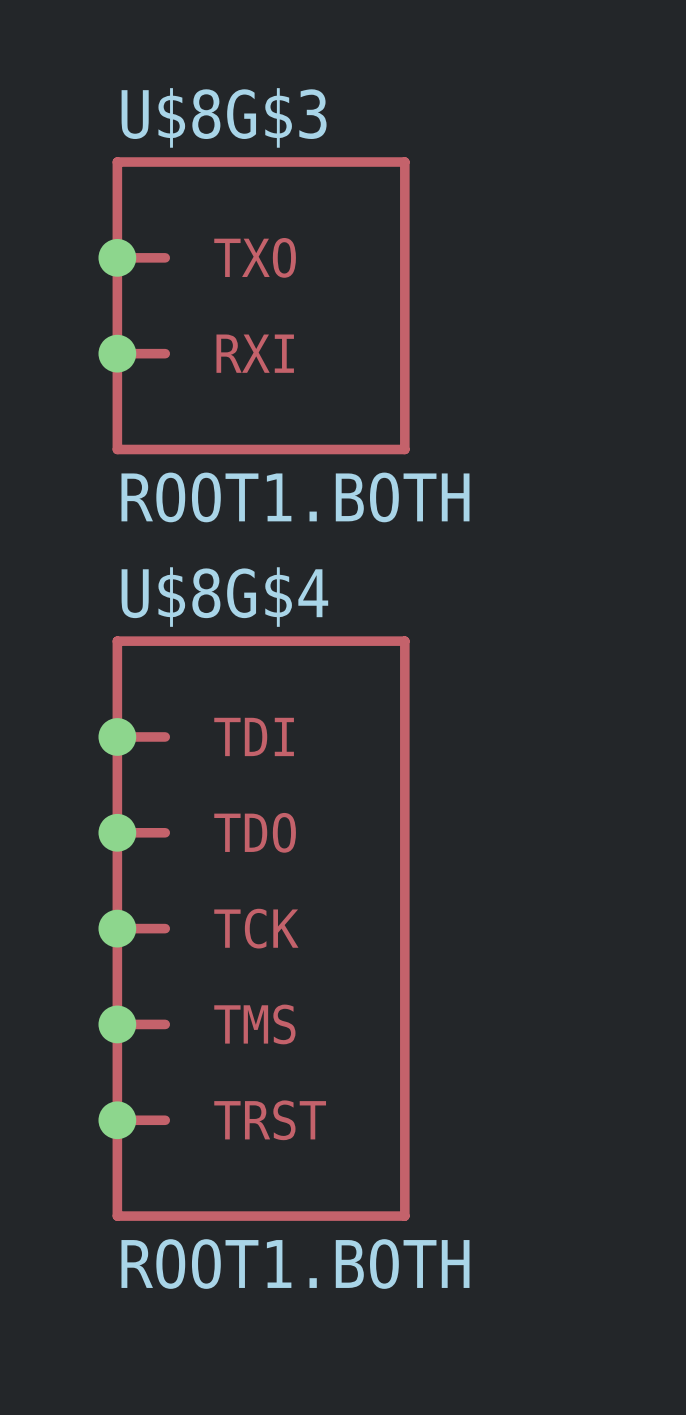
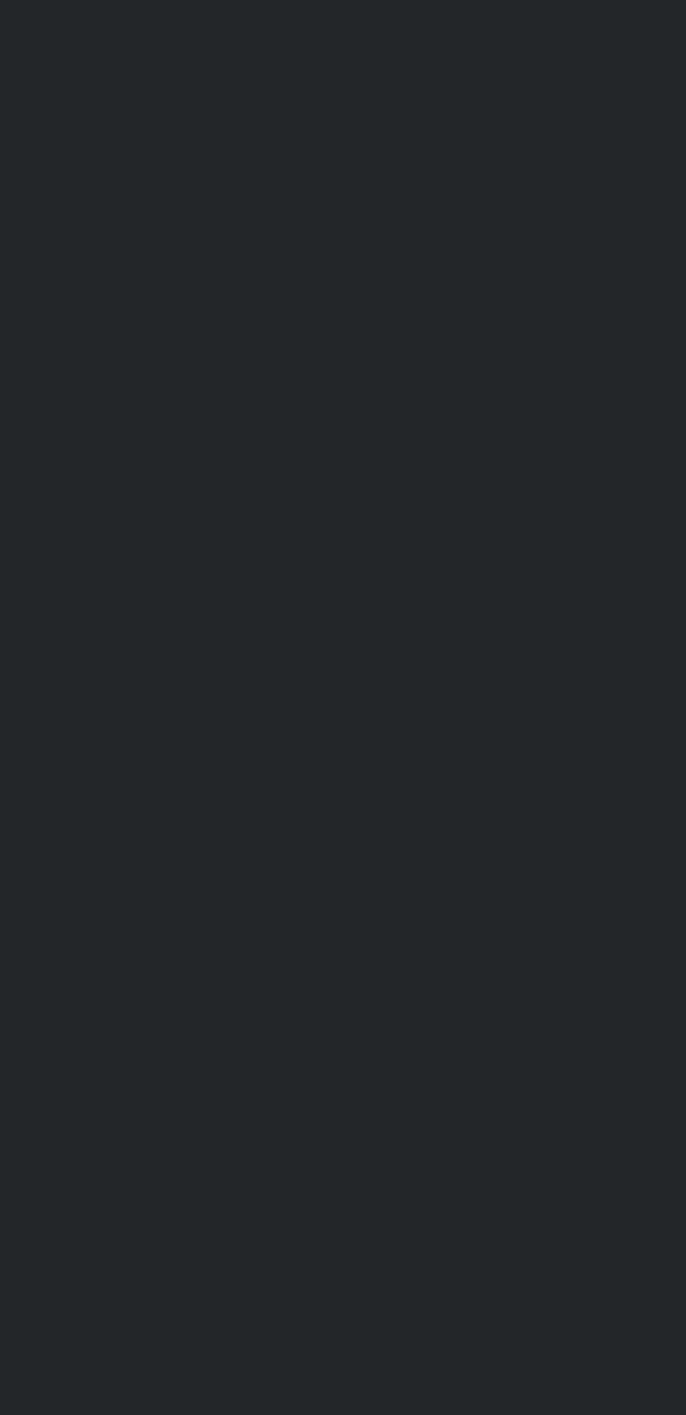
junction: (117, 257) -> none
U$8G$3: ROOT1.BOTH (261, 305) -> none
junction: (117, 353) -> none
junction: (117, 736) -> none
junction: (117, 832) -> none
junction: (117, 928) -> none
U$8G$4: ROOT1.BOTH (261, 928) -> none
junction: (117, 1024) -> none
junction: (117, 1120) -> none

